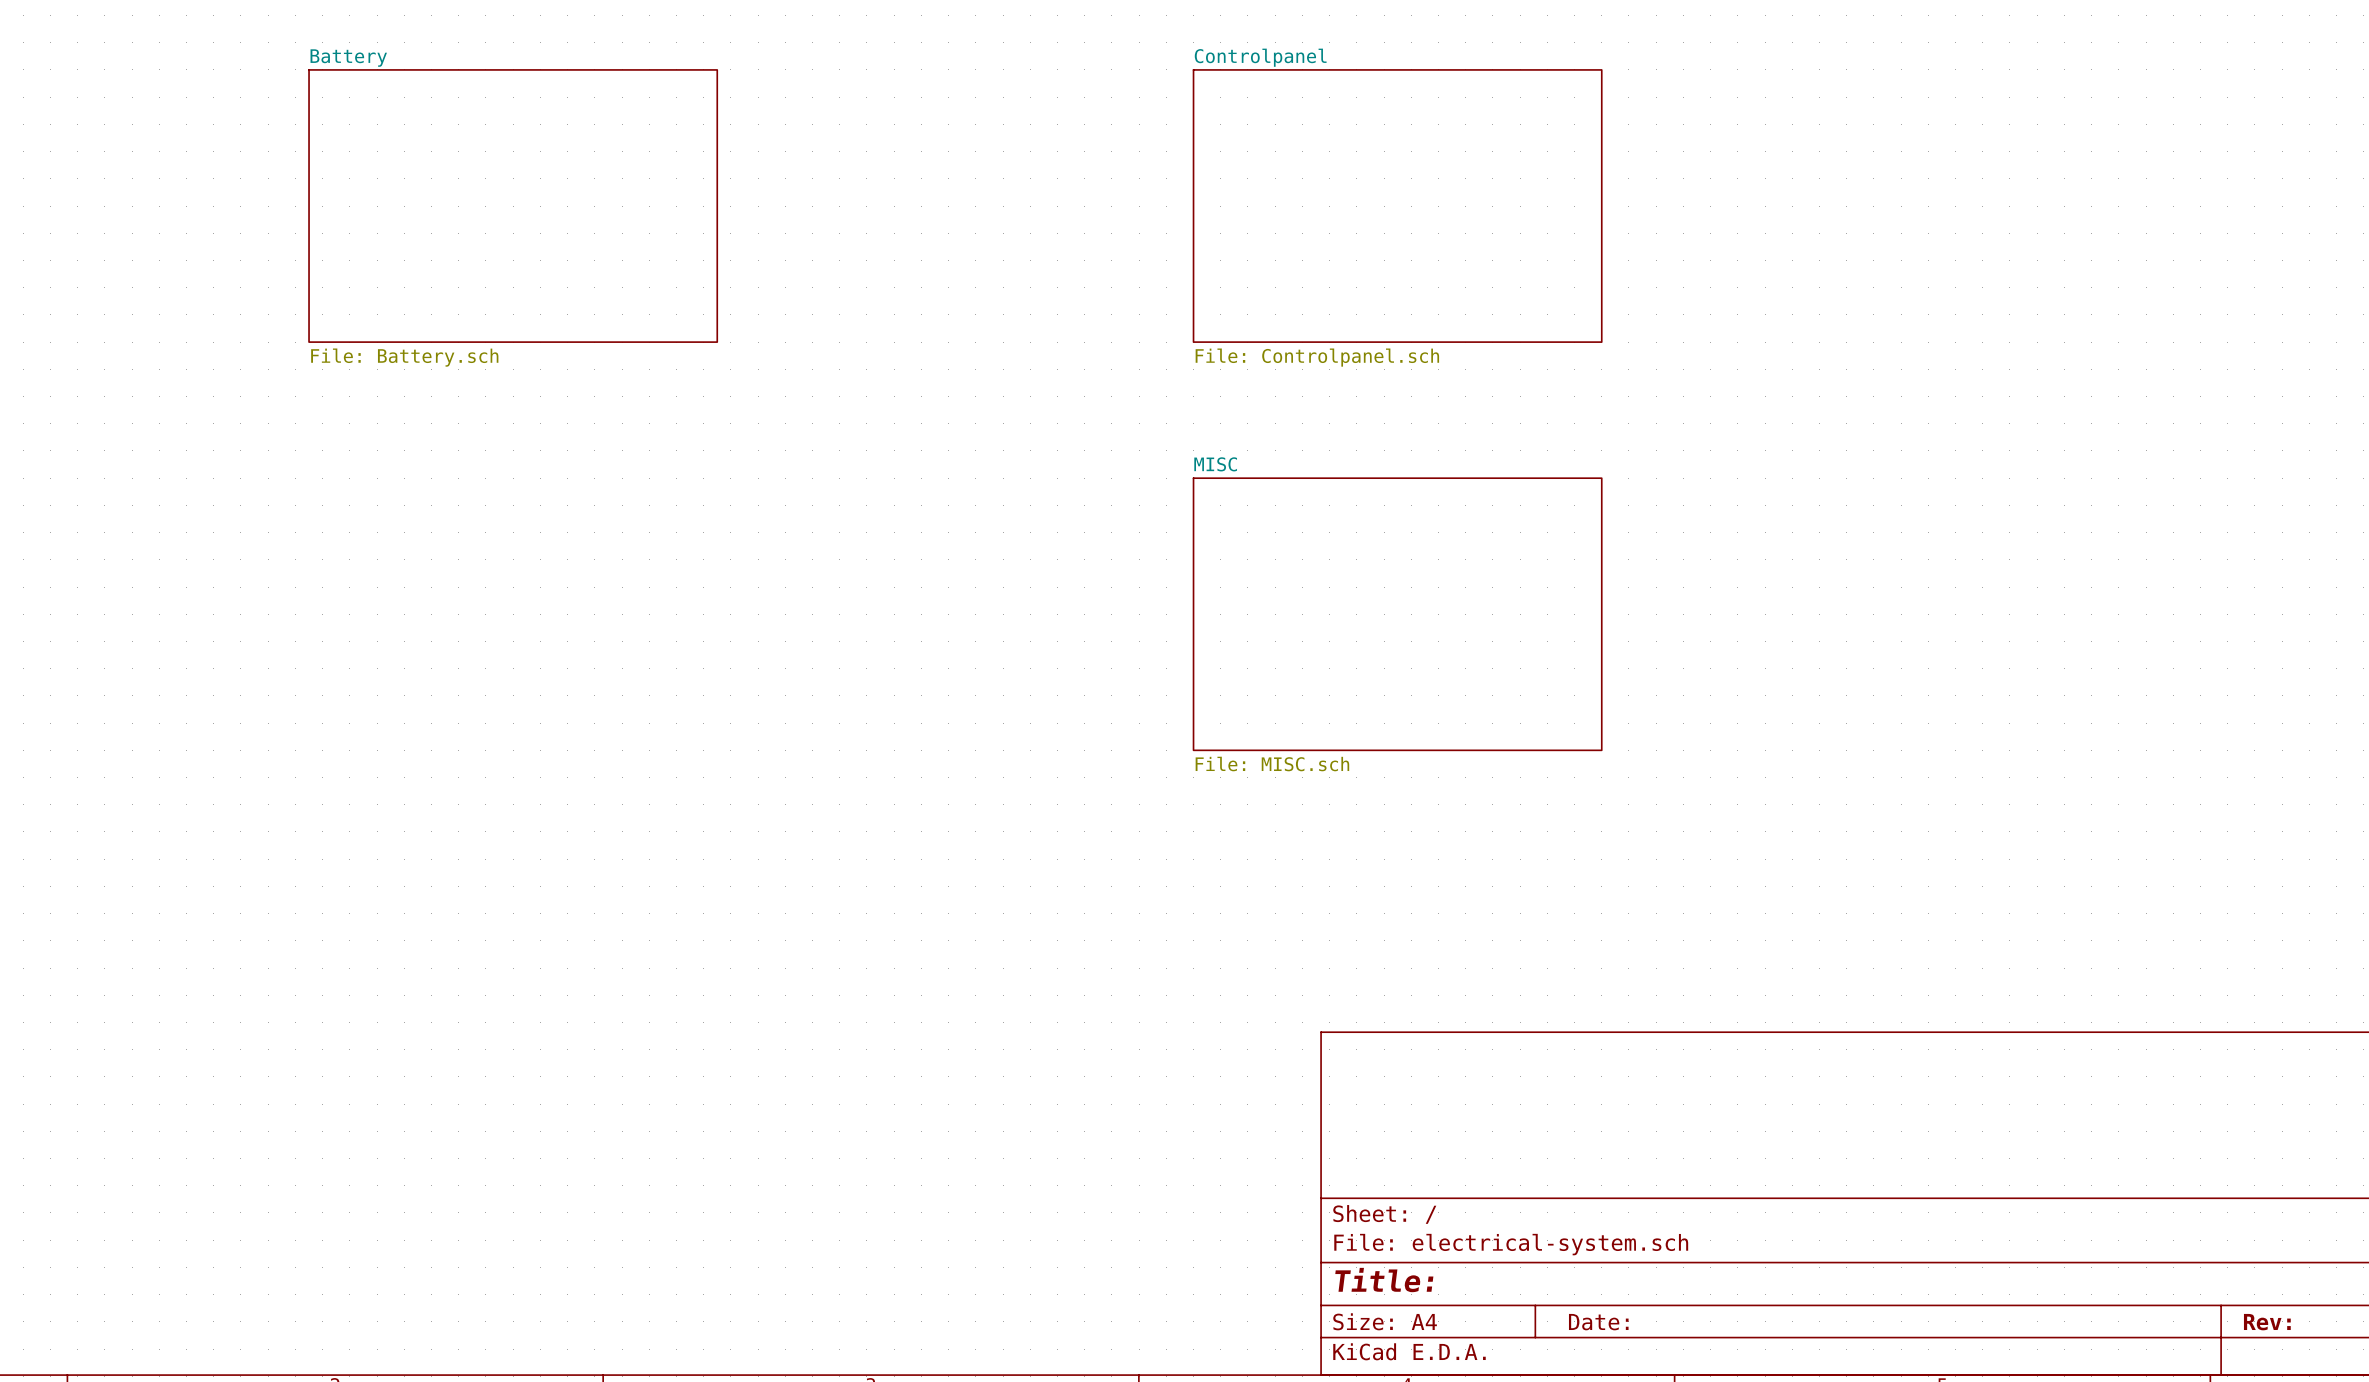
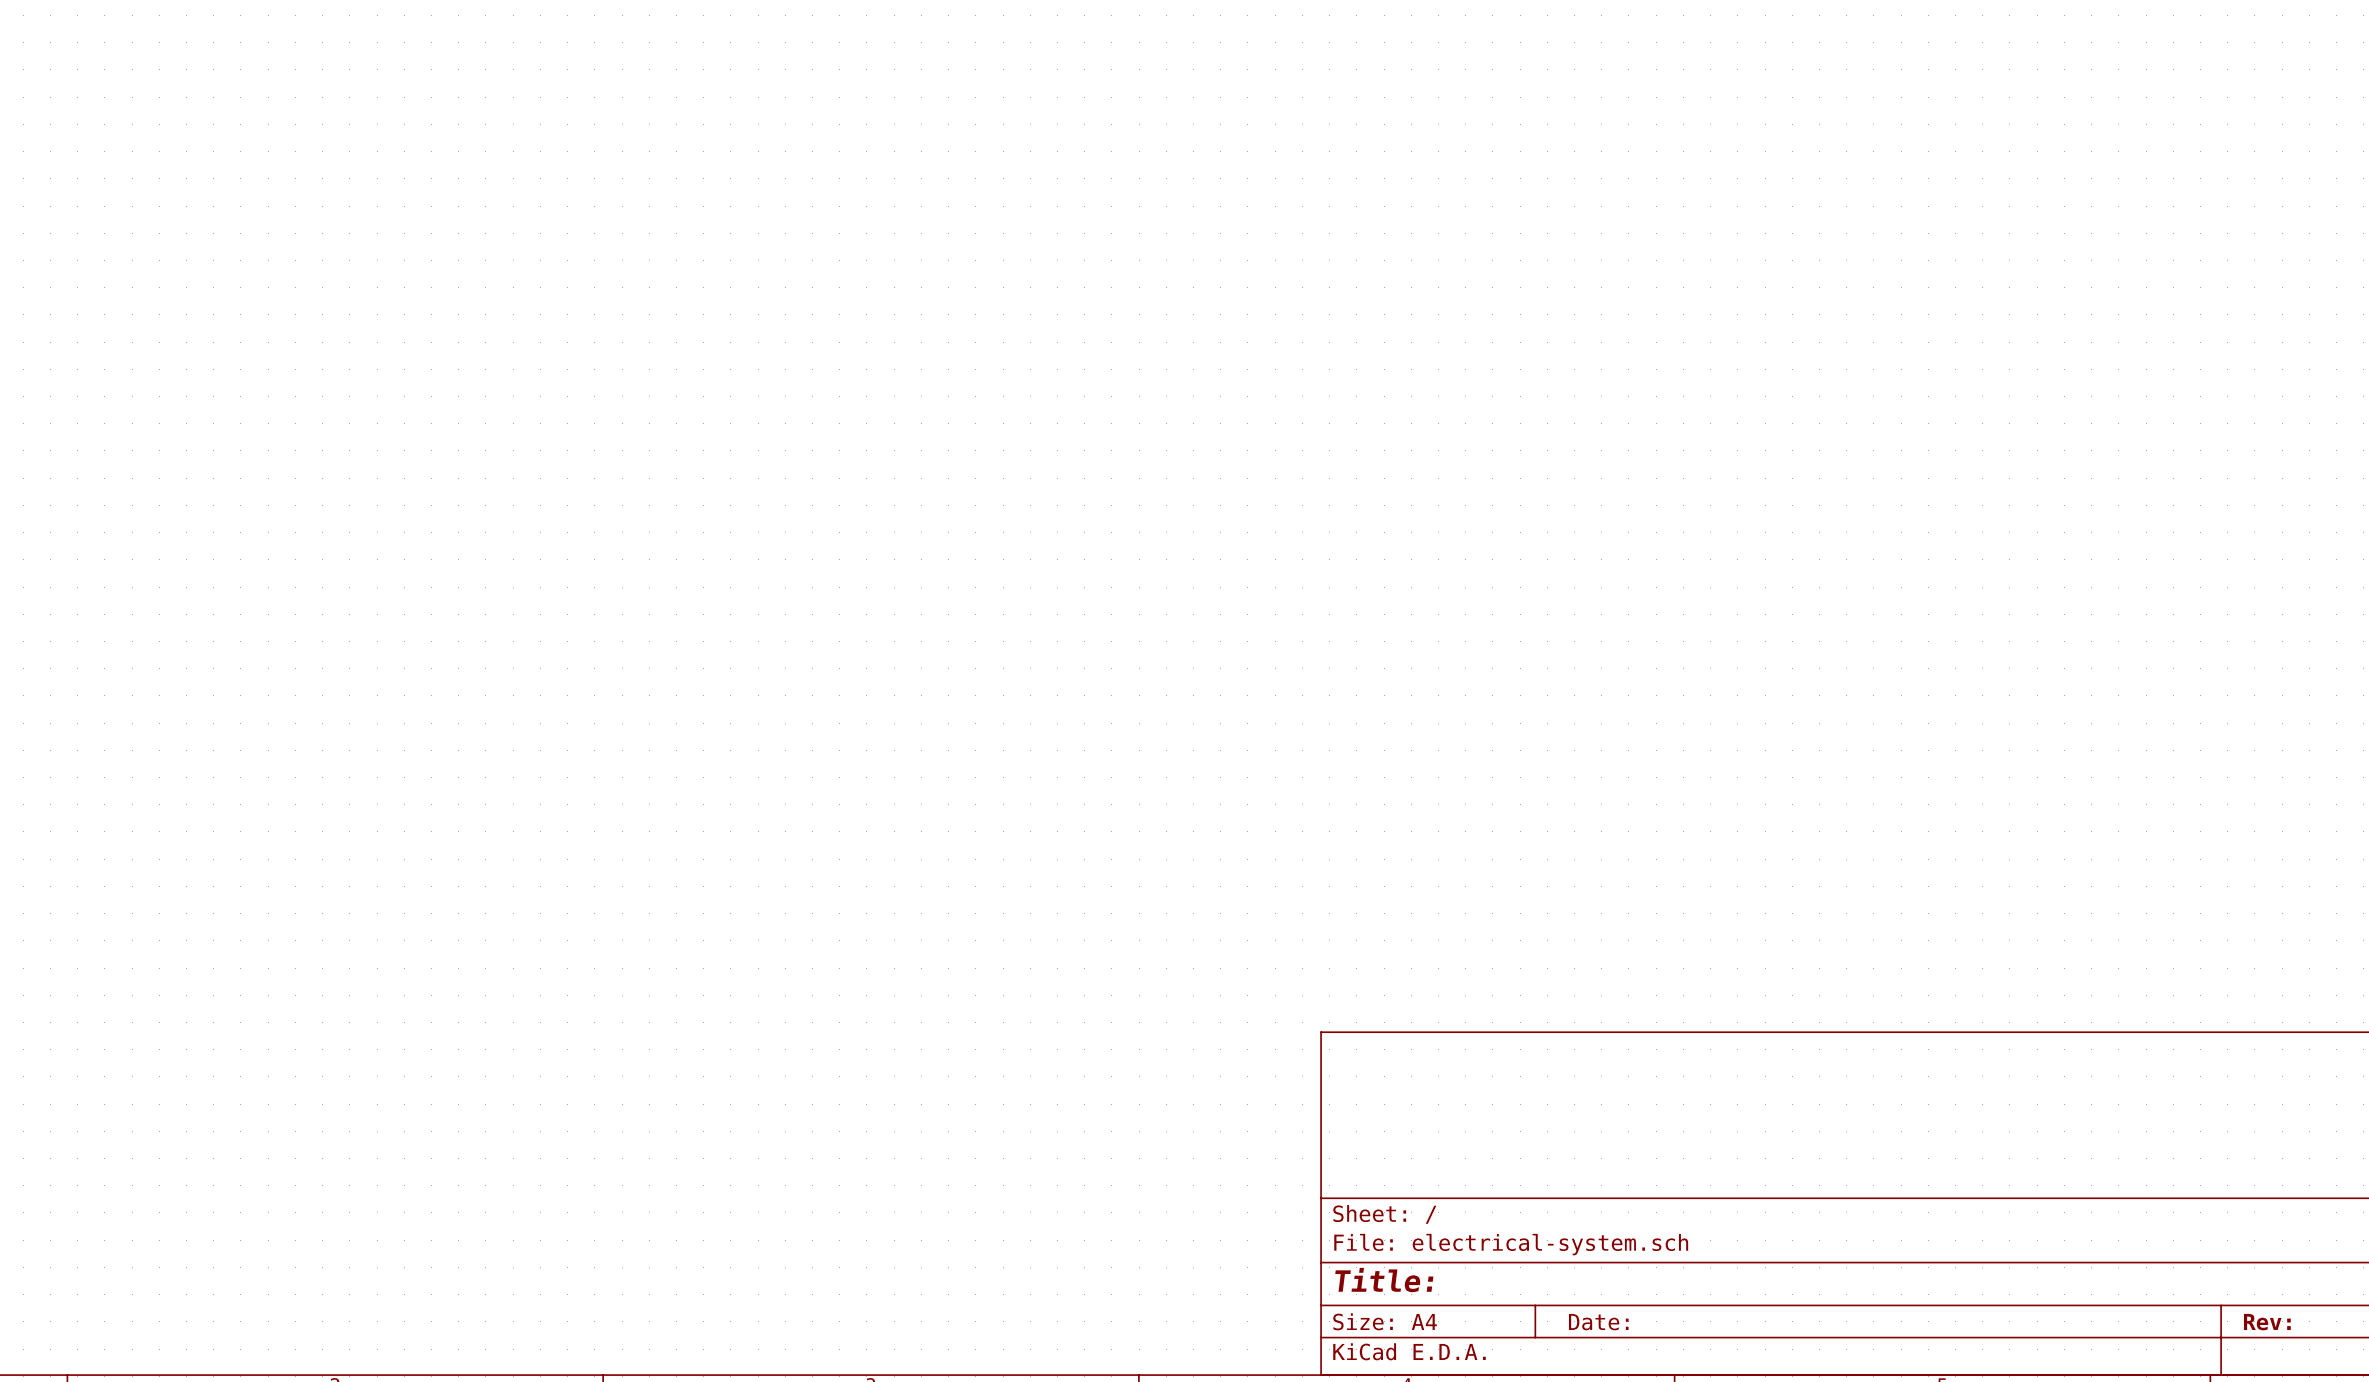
sheet Battery: File: Battery.sch (513, 206) -> none
sheet Controlpanel: File: Controlpanel.sch (1397, 206) -> none
sheet MISC: File: MISC.sch (1397, 614) -> none

